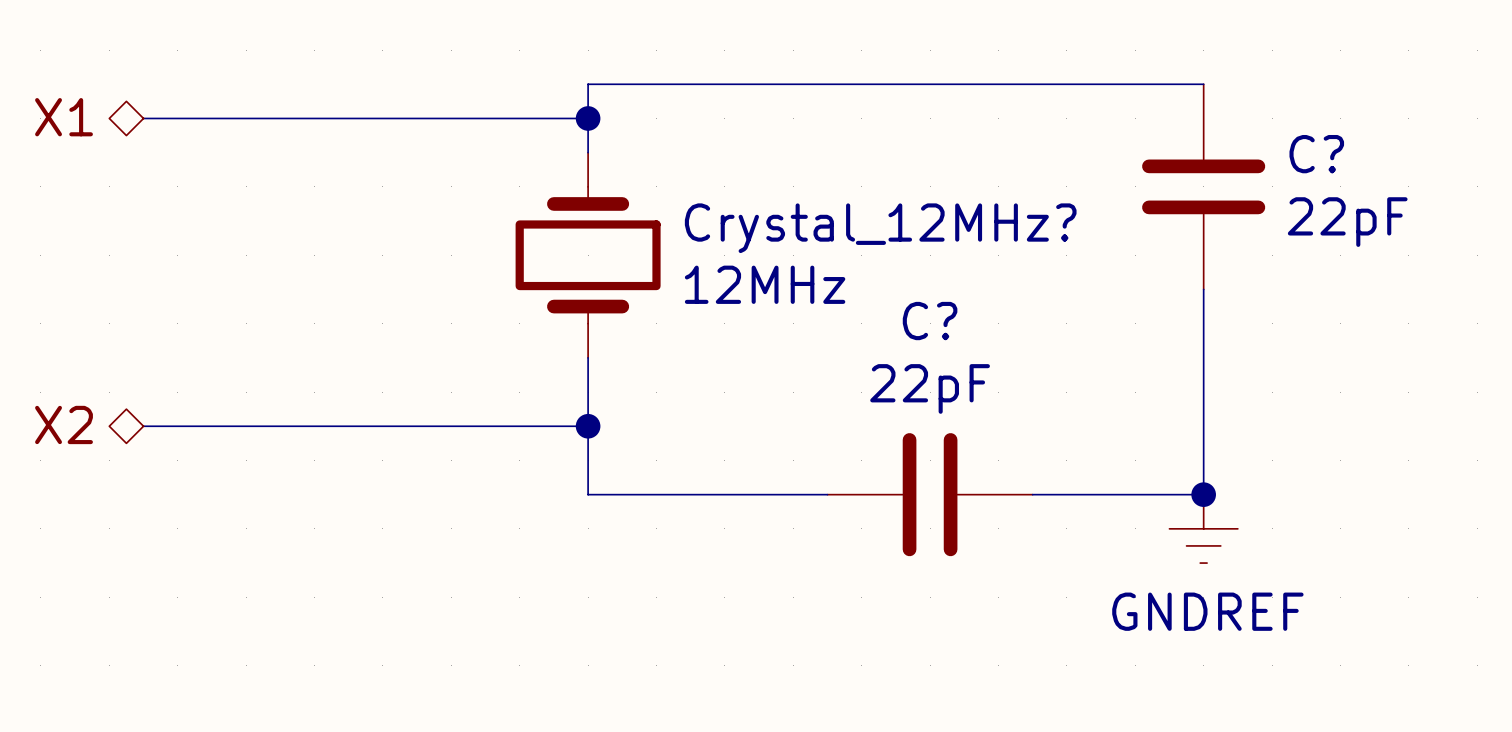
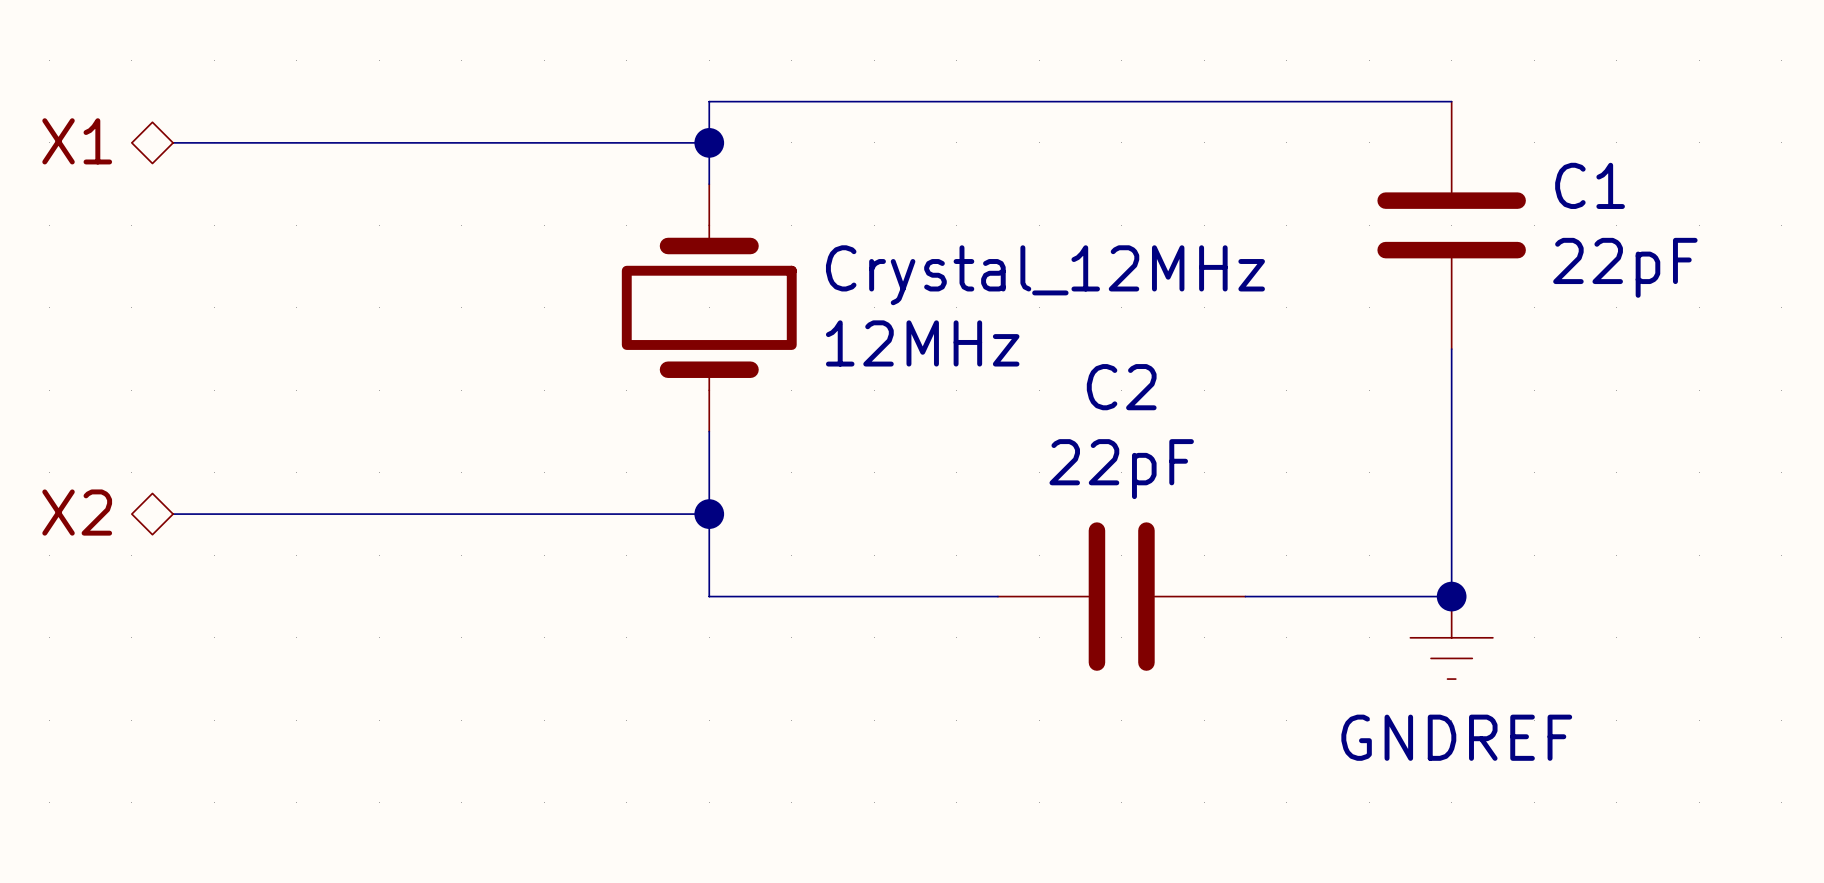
C? name: C? (1316, 154) -> C1 (1590, 185)
Crystal_12MHz? name: Crystal_12MHz? (880, 228) -> Crystal_12MHz (1045, 275)
C? name: C? (930, 321) -> C2 (1121, 387)

